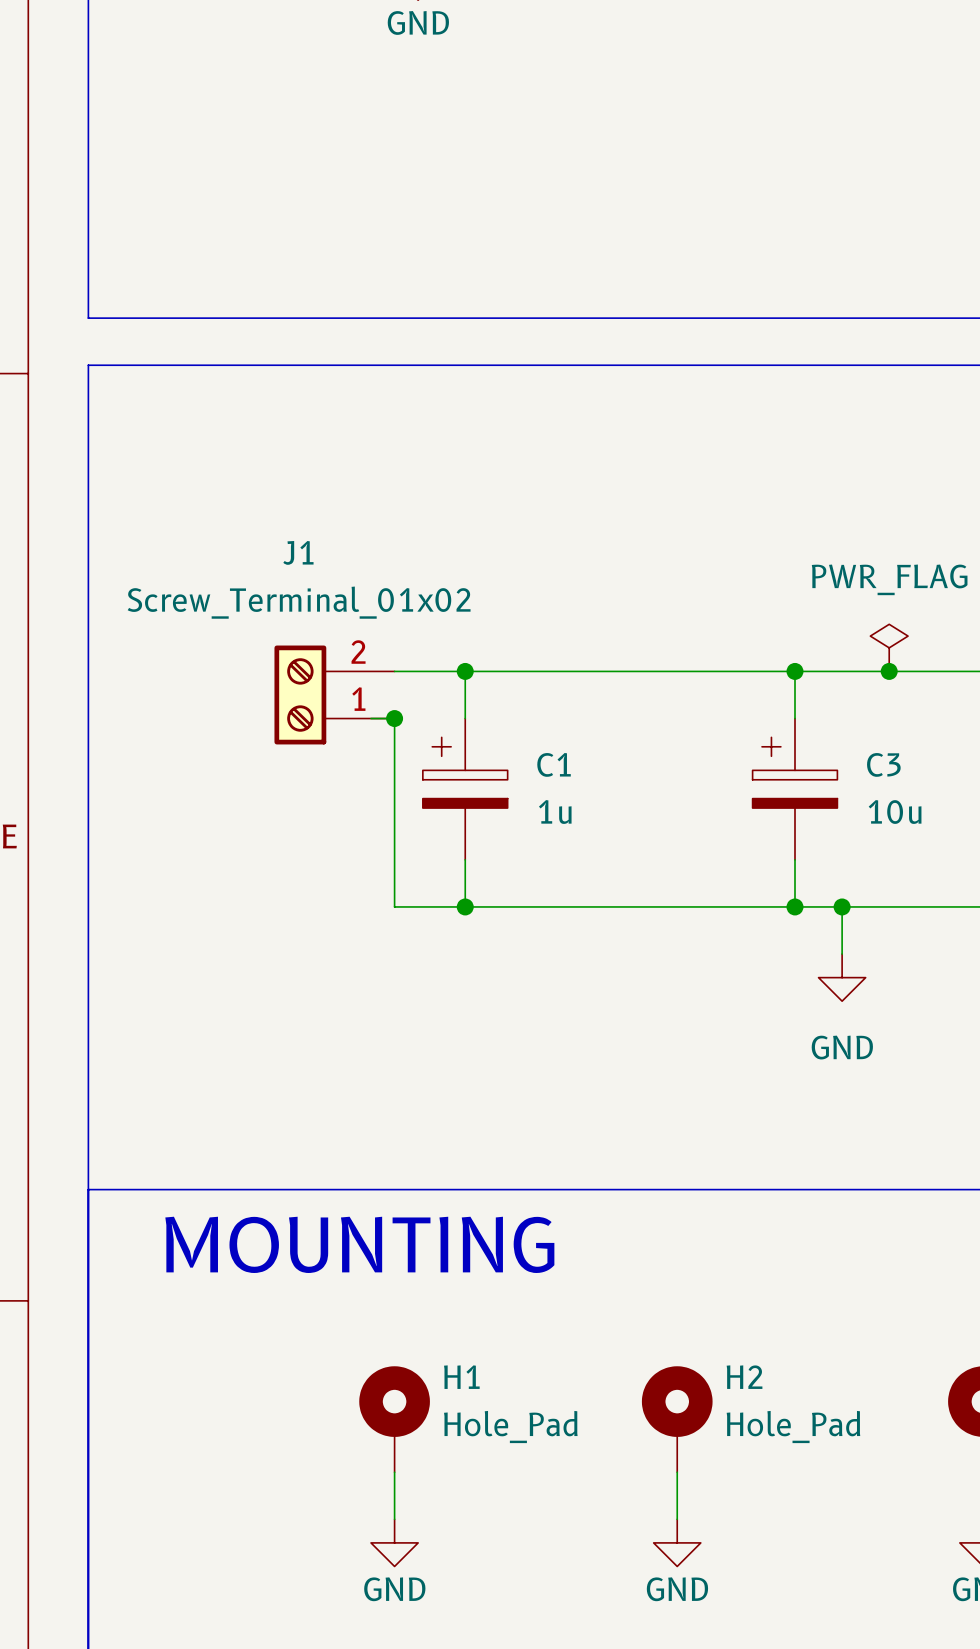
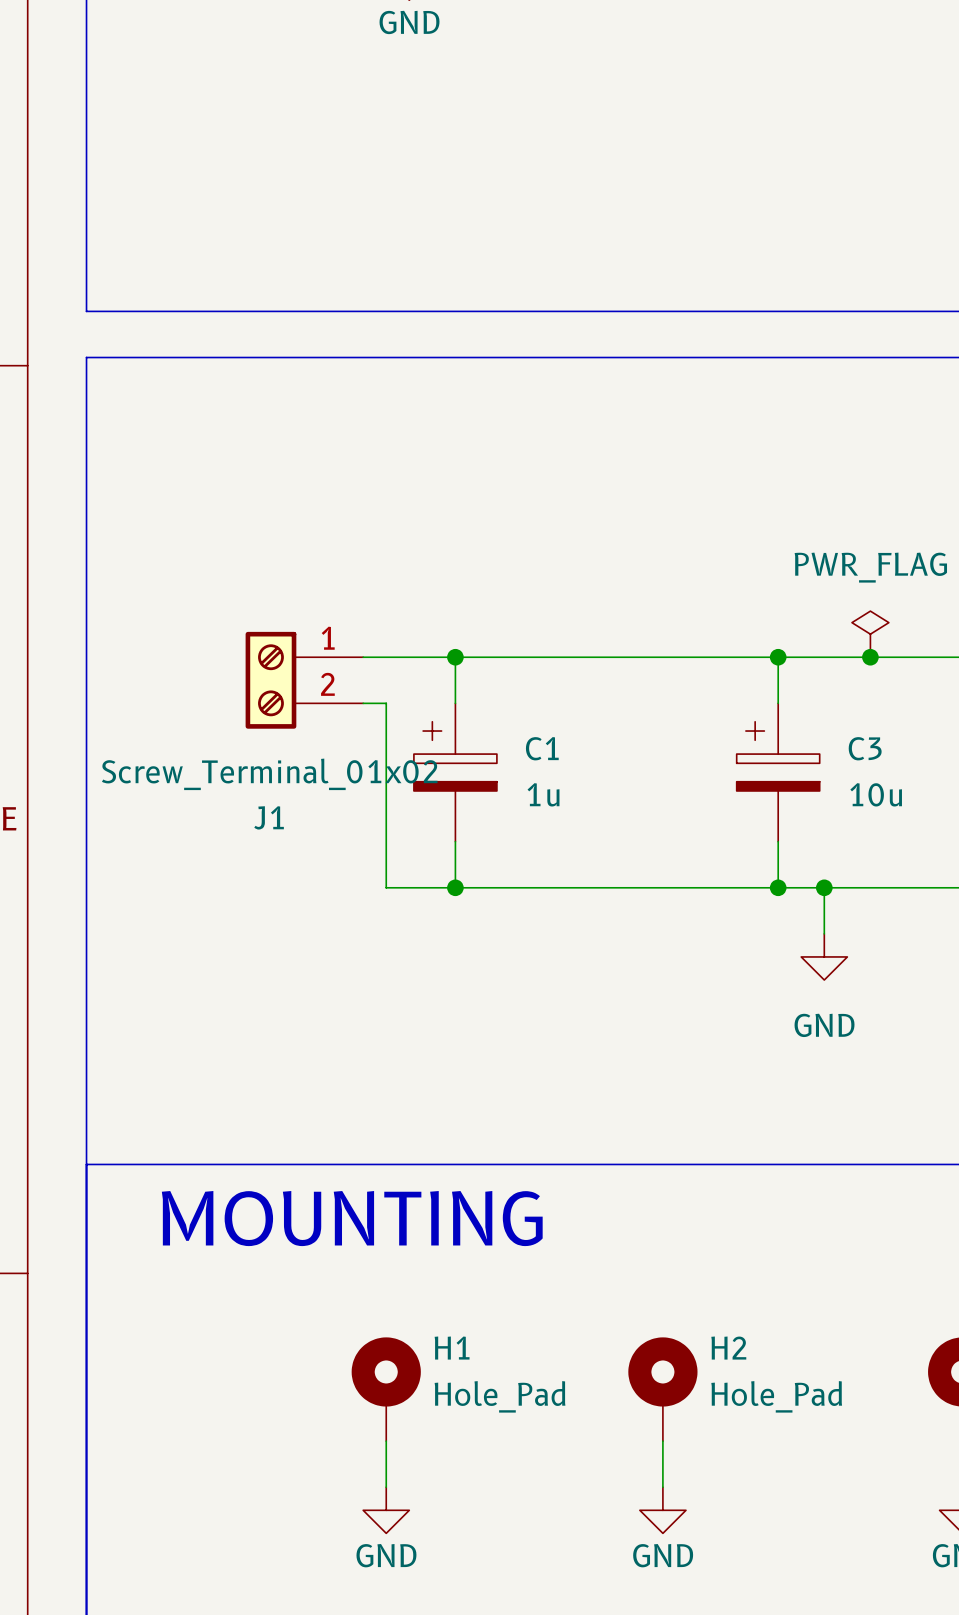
J1 flip: as is (300, 694) -> up-down (270, 680)
junction: (394, 718) -> none

